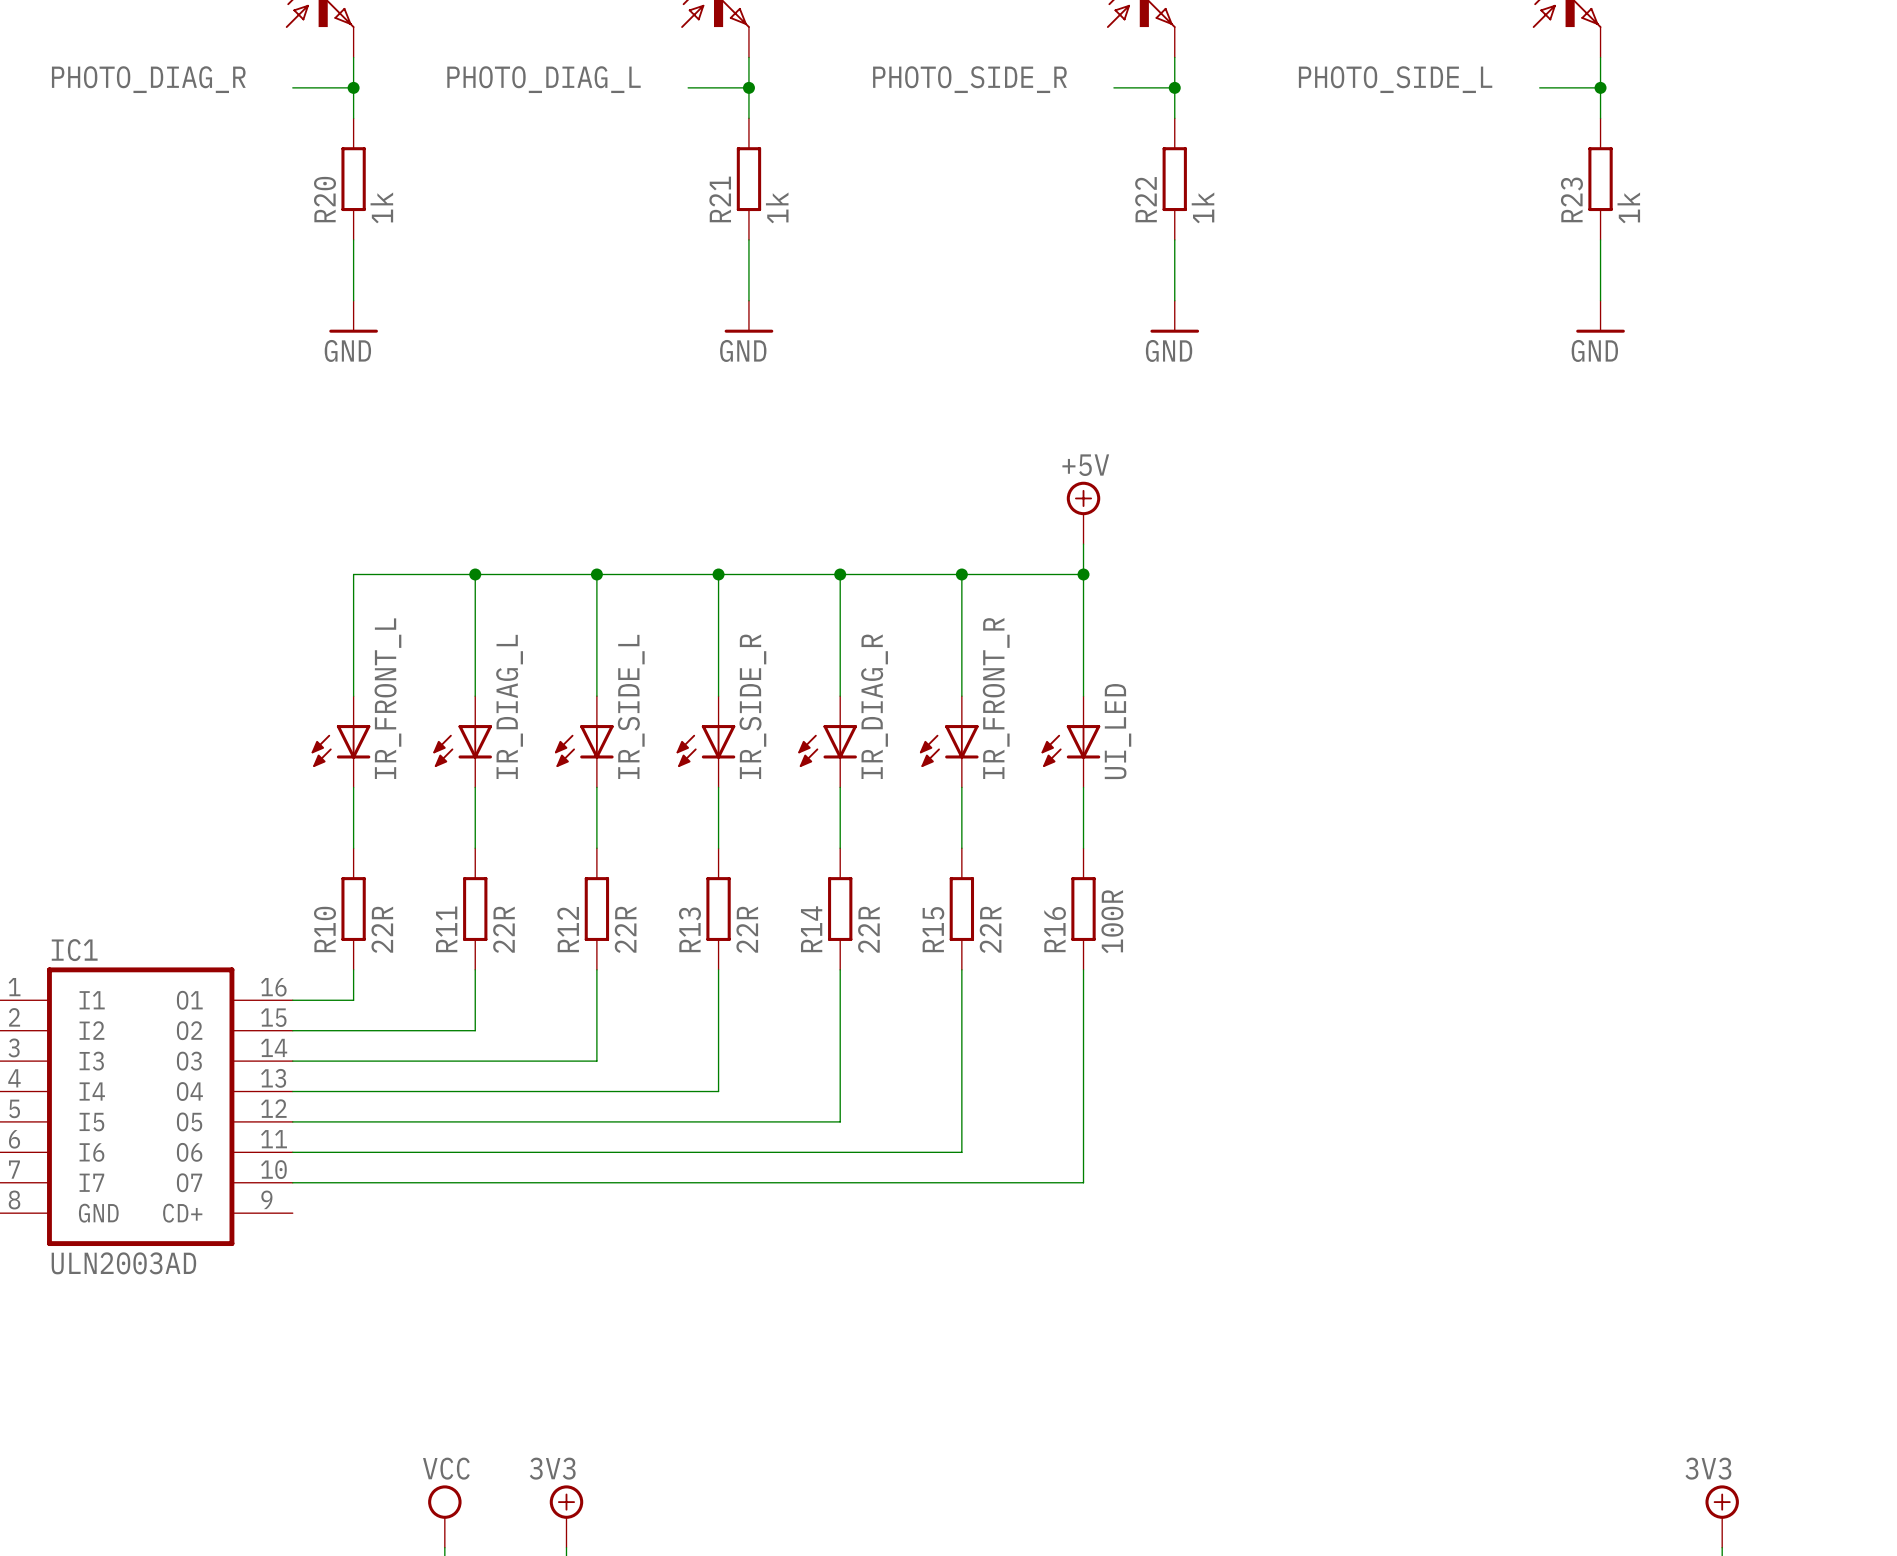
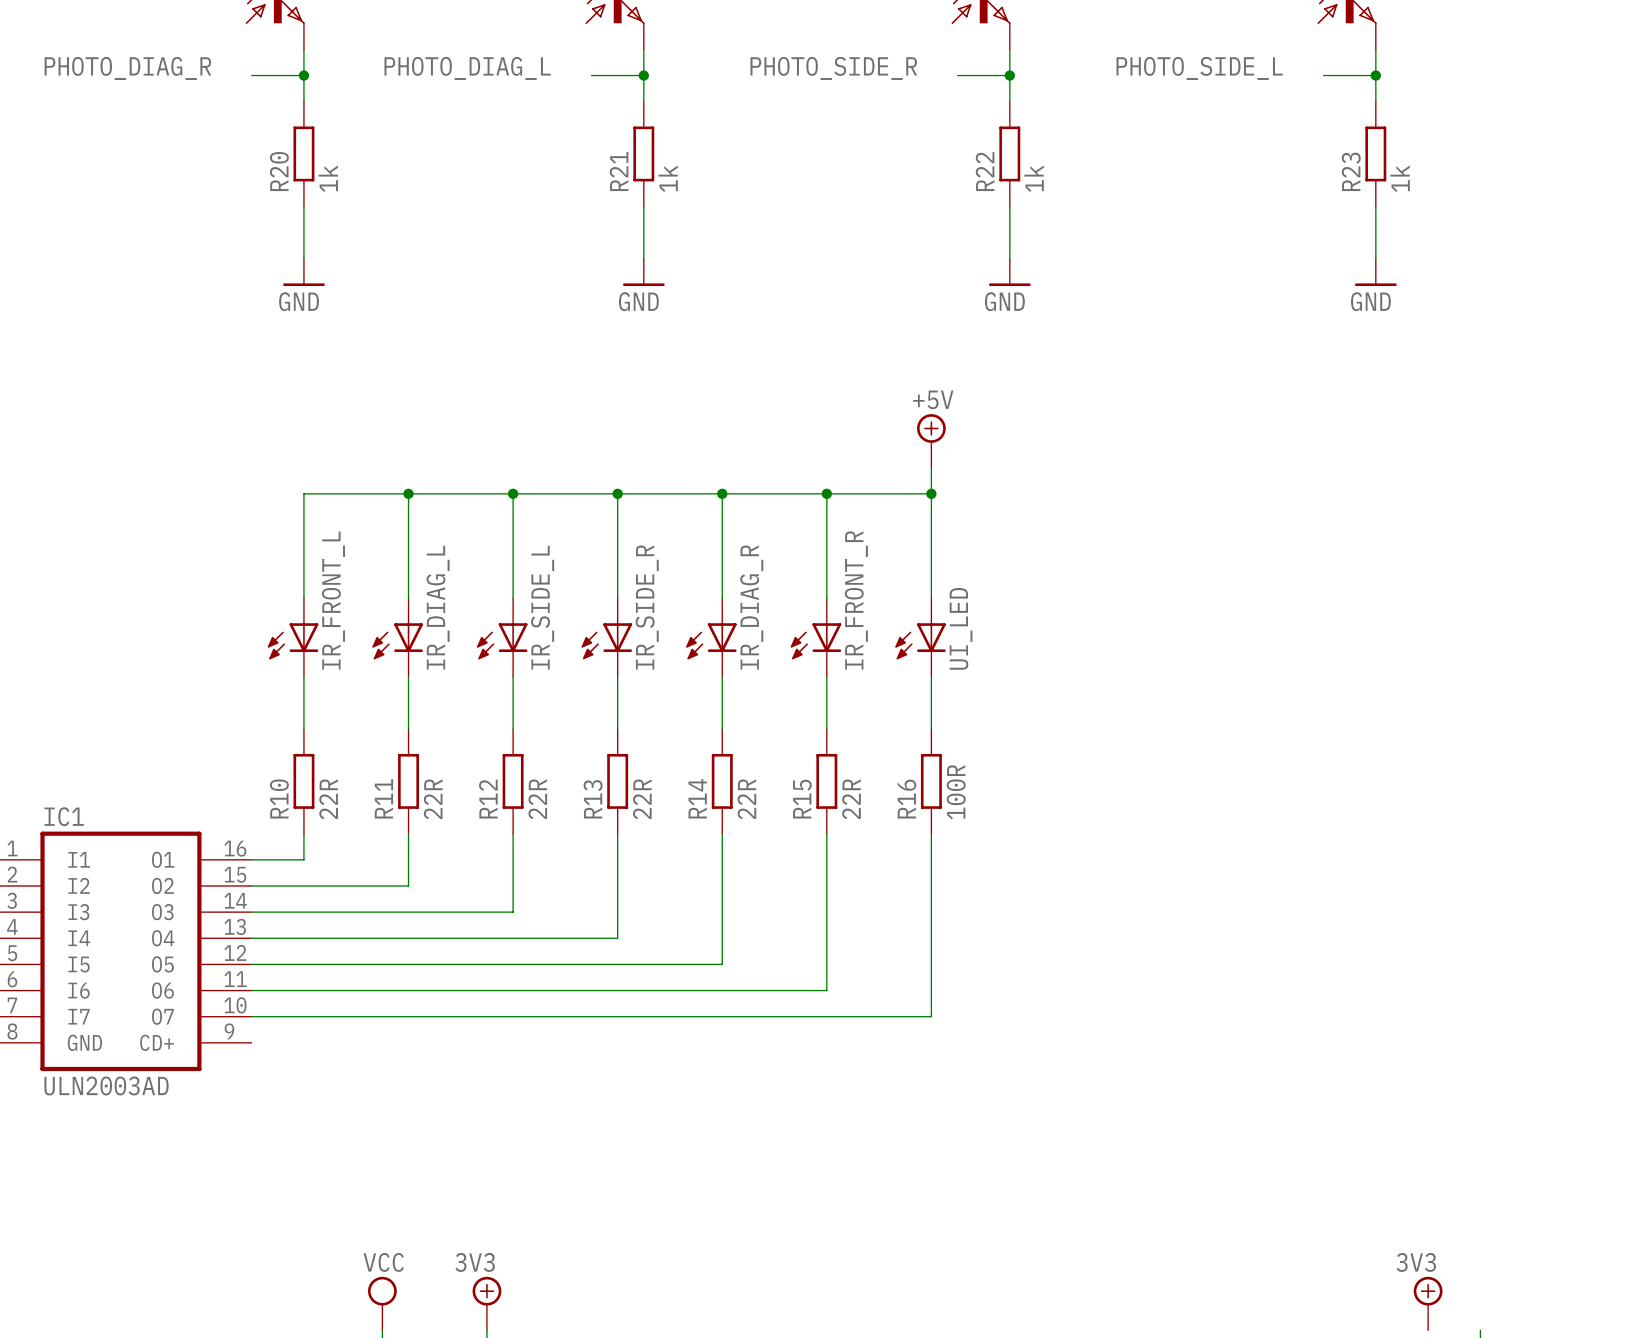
power symbol position: 3V3 (1722, 1516) -> 3V3 (1428, 1303)

